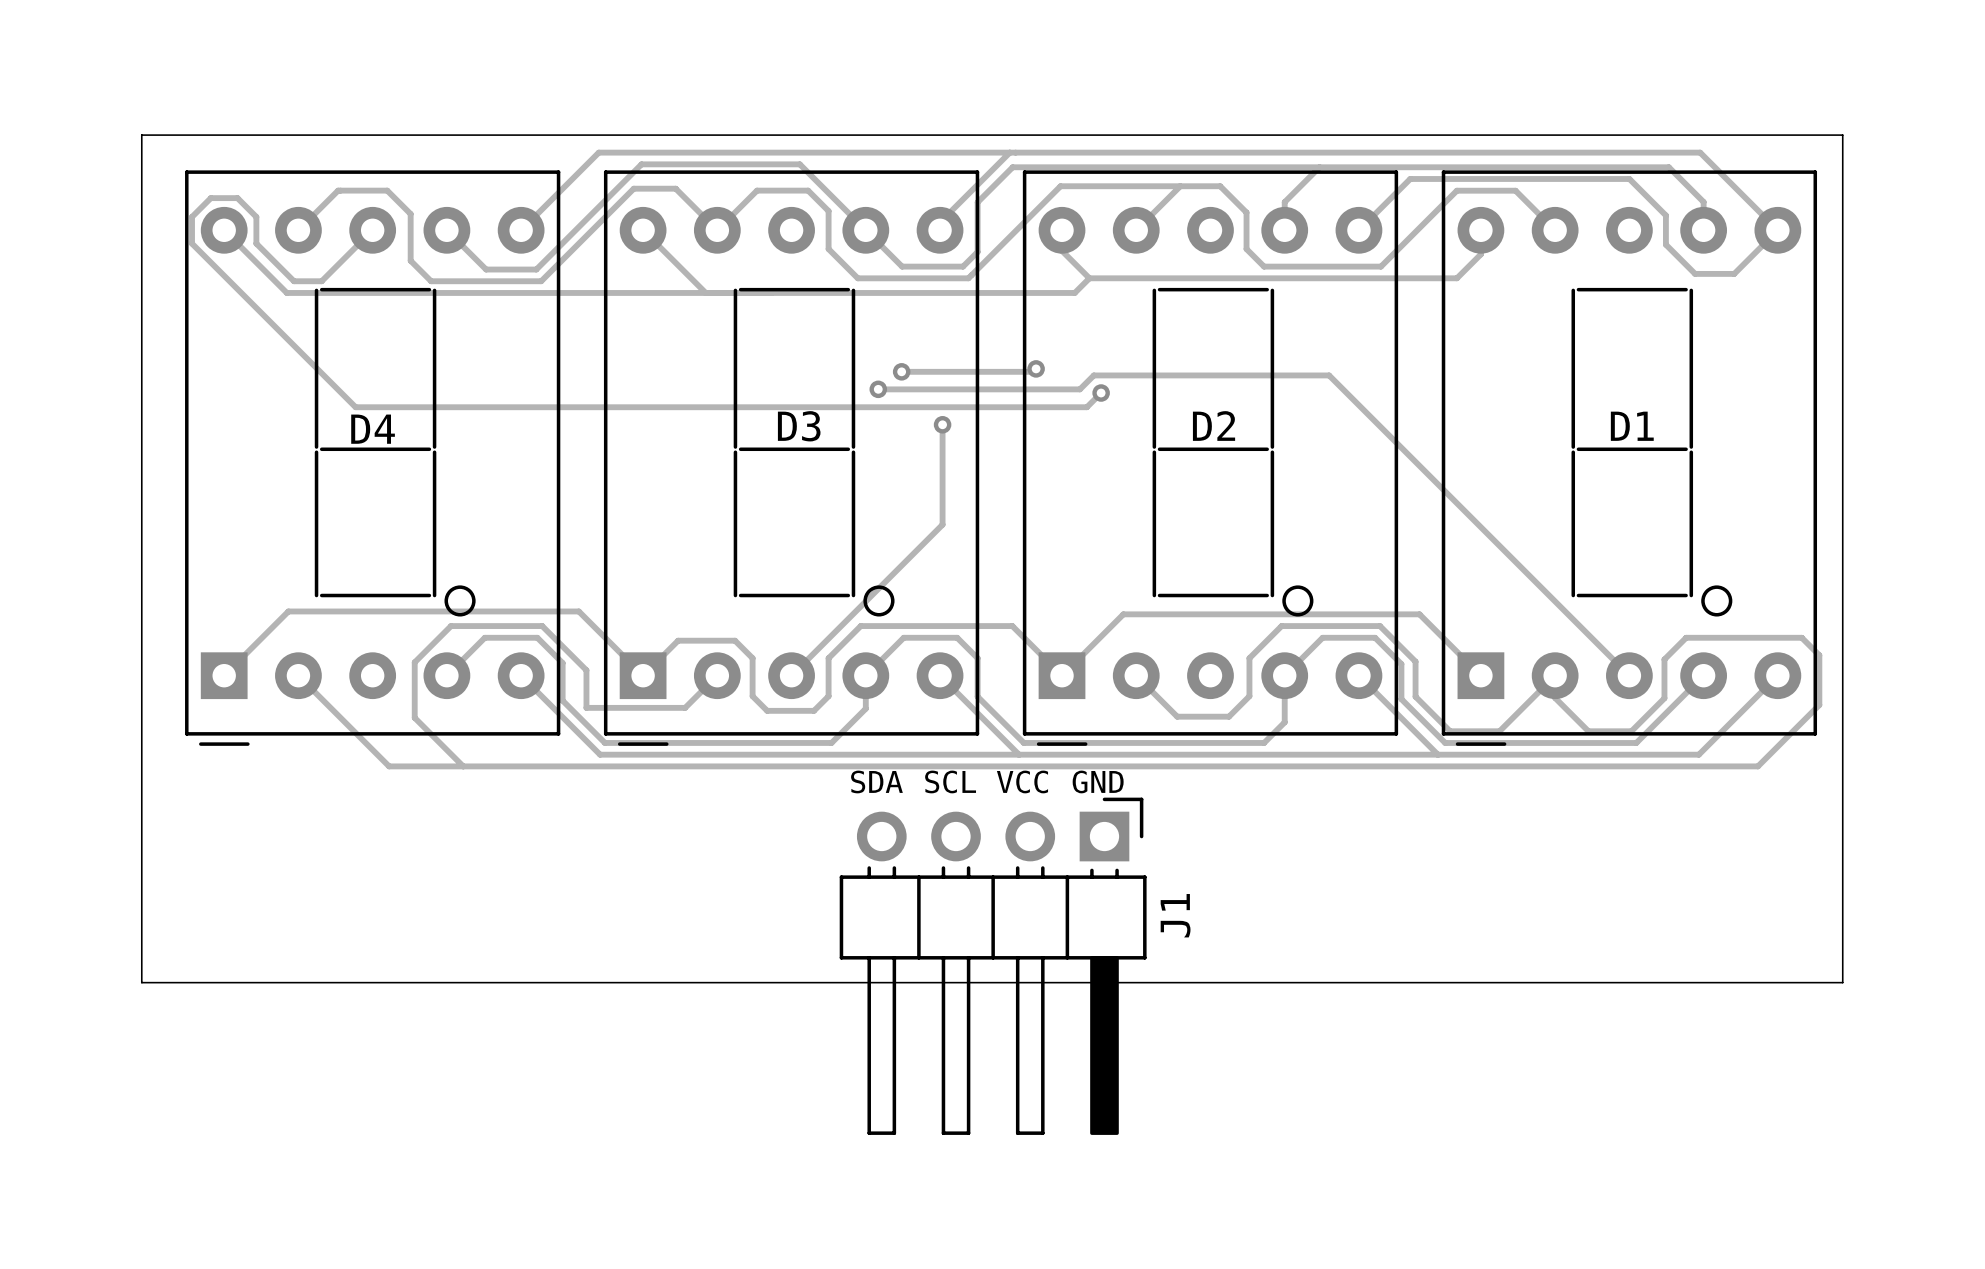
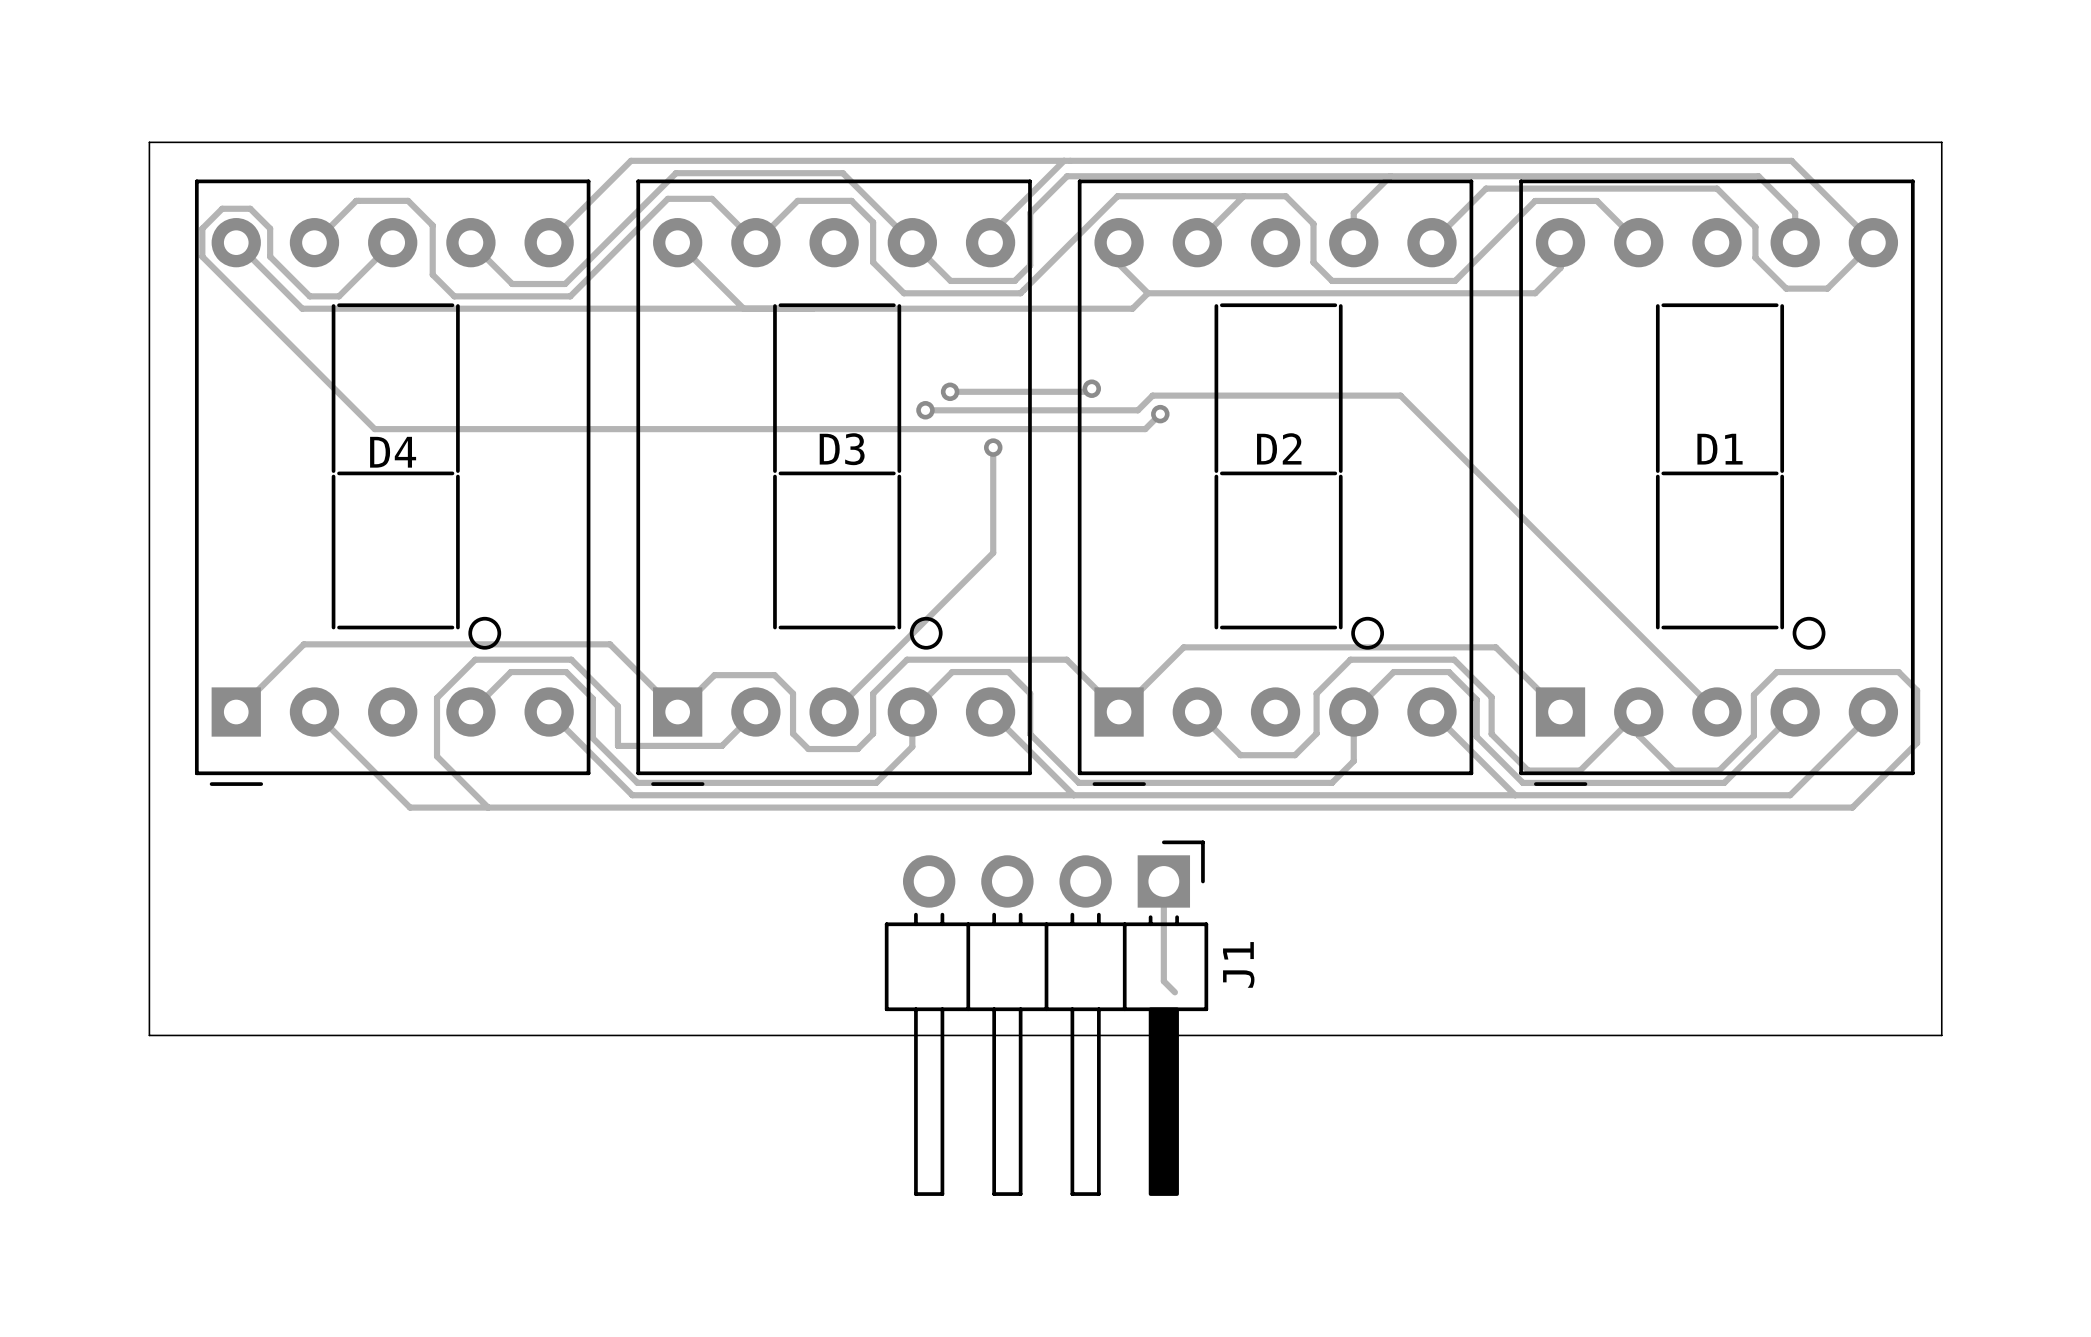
text: SDA (876, 781) -> none
text: SCL (950, 781) -> none
text: VCC (1022, 781) -> none
text: GND (1098, 781) -> none
track: none -> (1163, 881) (1163, 981) (1174, 992)

